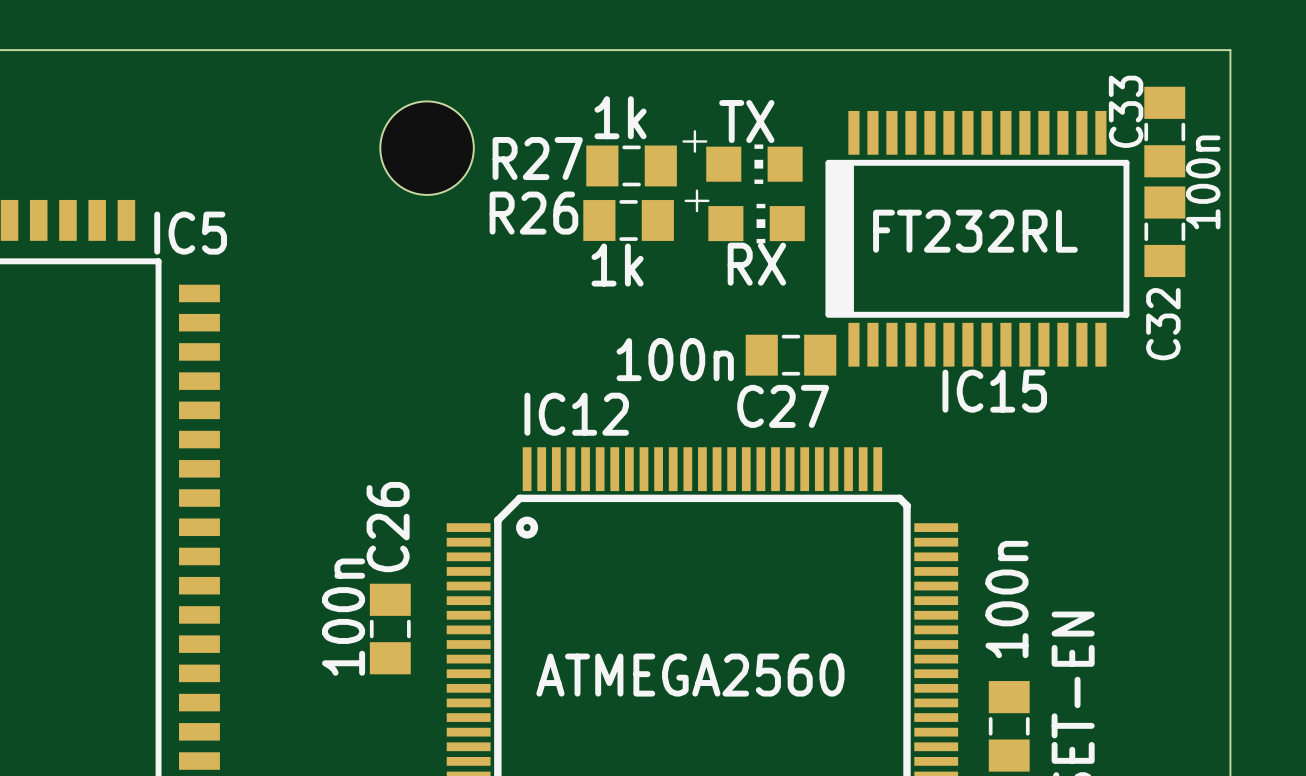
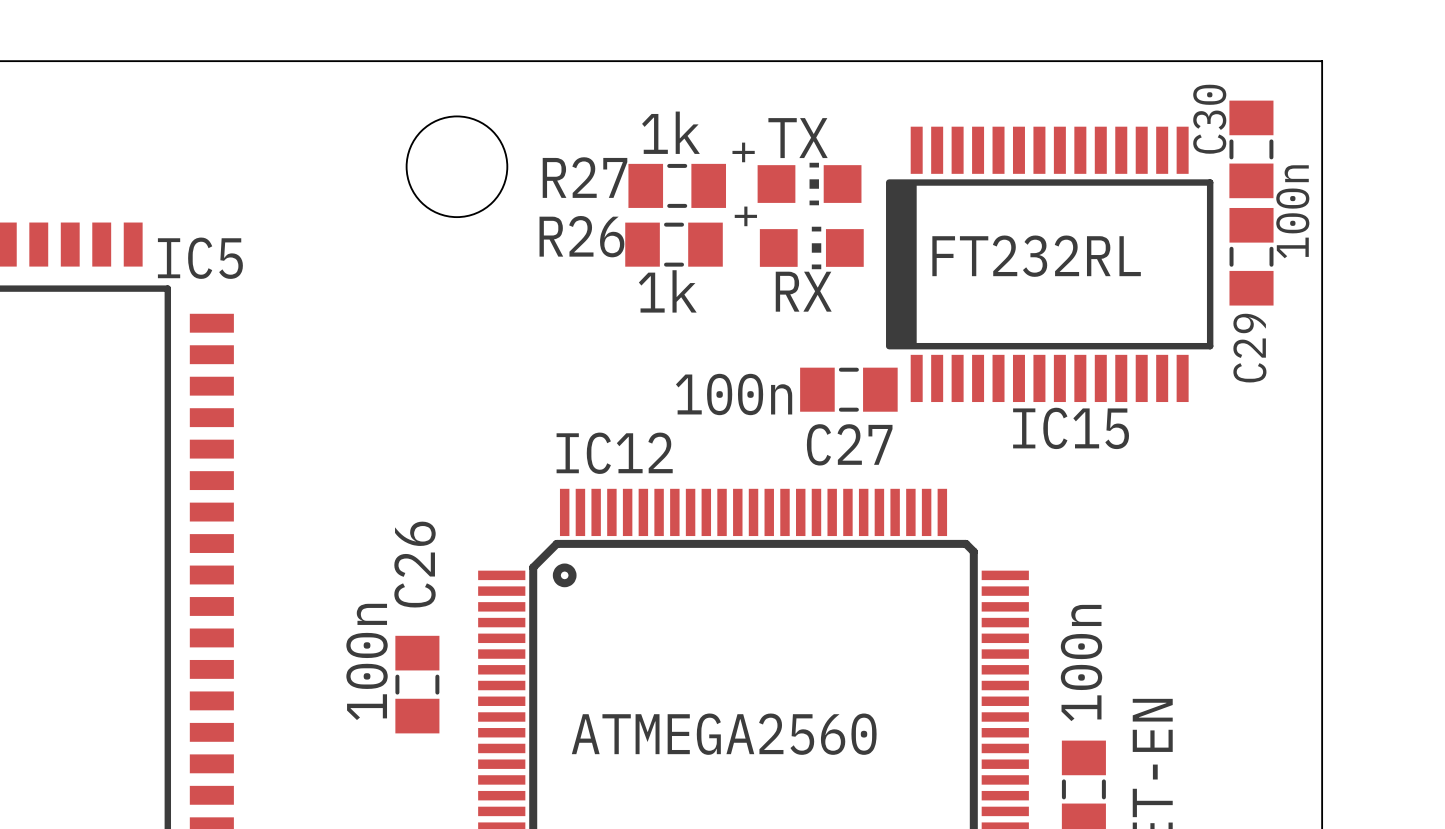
C33 name: C33 (1126, 111) -> C30 (1209, 119)
C32 name: C32 (1163, 324) -> C29 (1249, 348)

